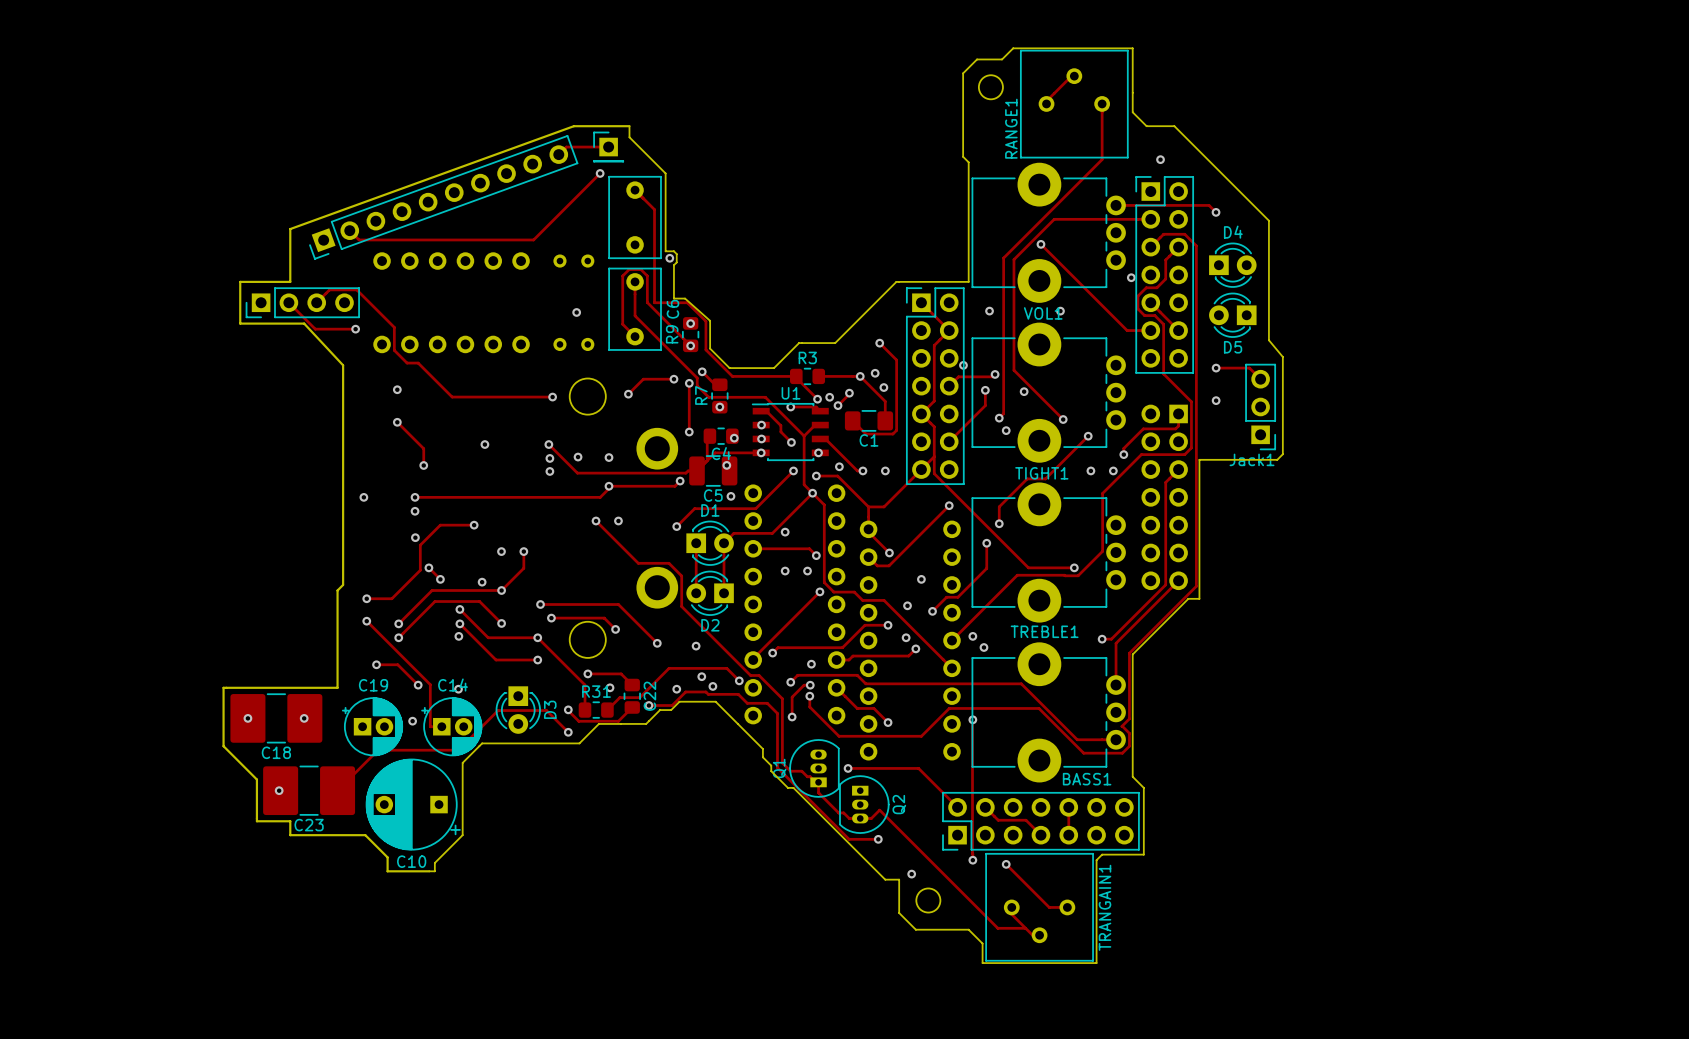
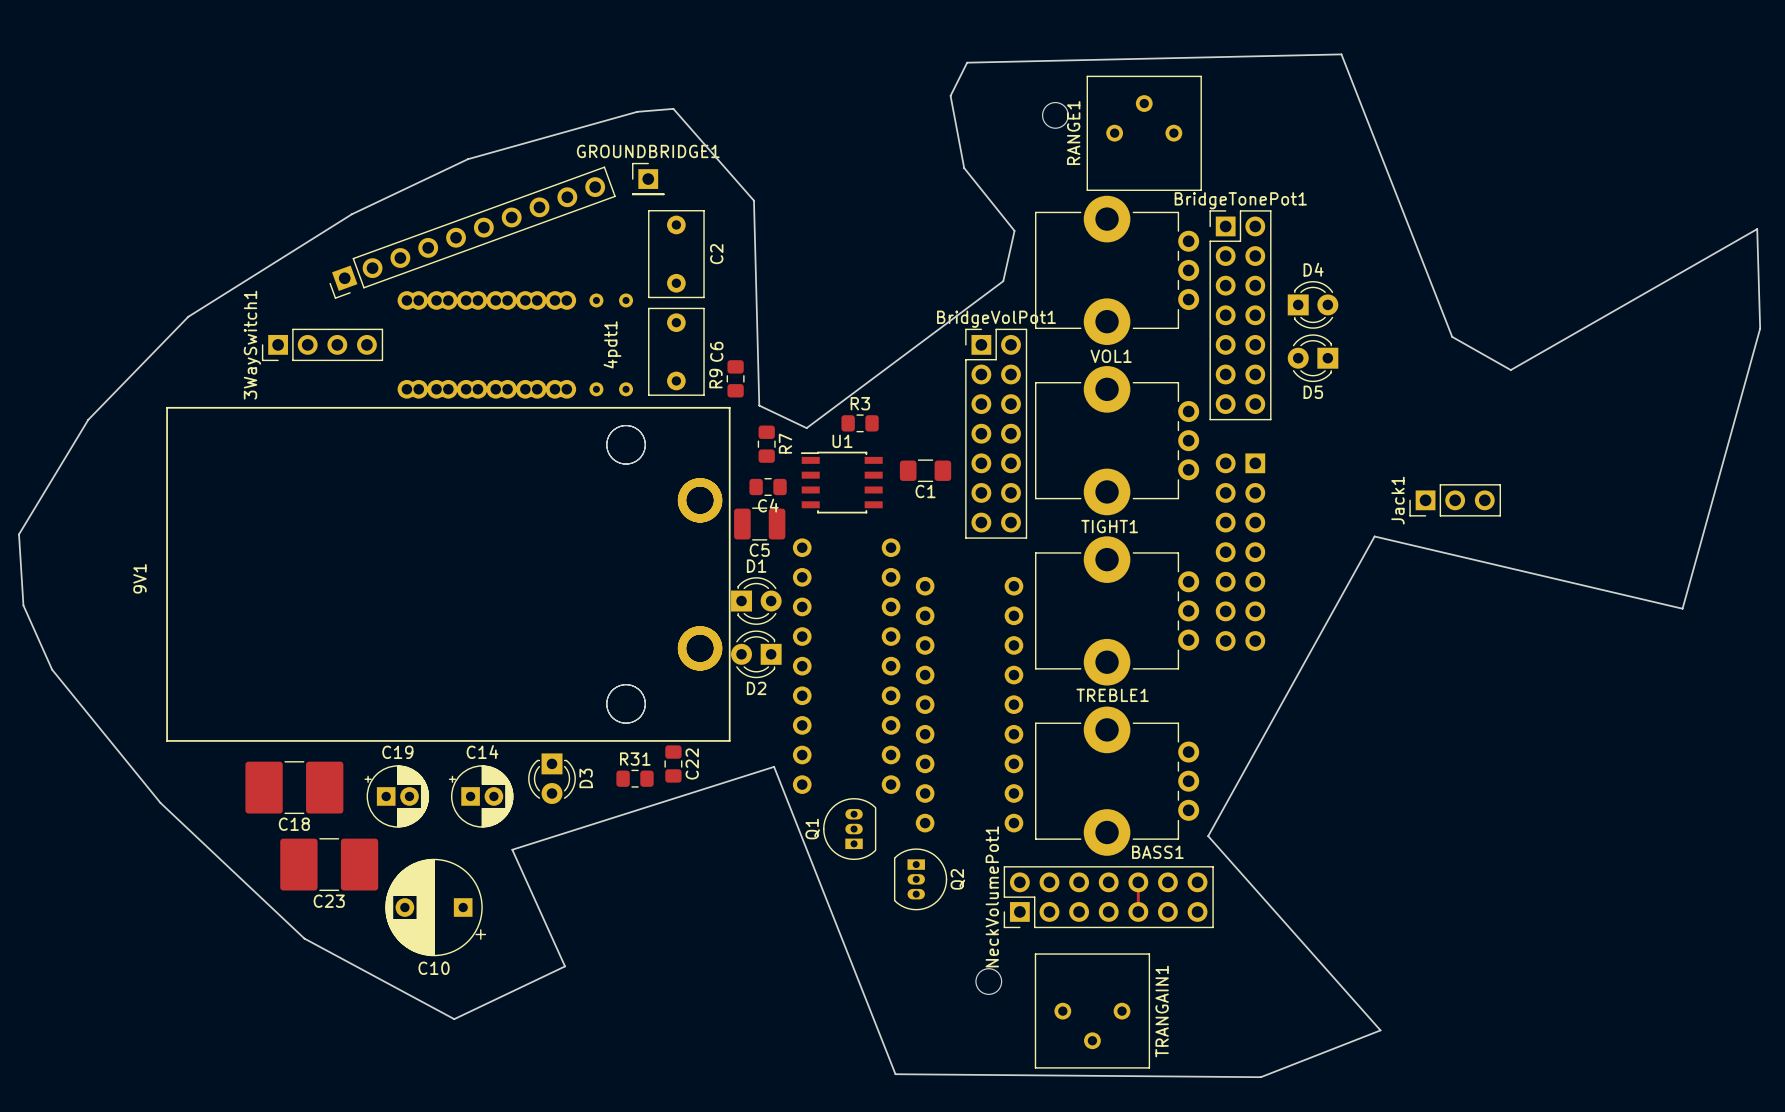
board edge: (1013, 48) (1002, 59) (977, 59) (963, 73) (963, 156) (968, 162) (968, 281) (896, 281) (835, 343) (799, 343) (774, 368) (729, 368) (710, 348) (710, 320) (685, 298) (673, 298) (673, 265) (676, 262) (676, 254) (673, 251) (665, 251) (665, 173) (629, 137) (629, 126) (573, 126) (290, 229) (290, 281) (240, 281) (240, 323) (304, 323) (343, 365) (343, 584) (337, 590) (337, 687) (223, 687) (223, 746) (256, 779) (256, 821) (290, 821) (290, 835) (365, 835) (387, 857) (387, 871) (434, 871) (434, 862) (462, 835) (462, 762) (482, 743) (579, 743) (598, 723) (646, 723) (660, 710) (671, 710) (679, 701) (715, 701) (762, 748) (762, 757) (771, 765) (771, 771) (787, 787) (793, 787) (885, 879) (899, 879) (899, 913) (915, 929) (968, 929) (982, 943) (982, 963) (1096, 963) (1096, 860) (1102, 854) (1143, 854) (1143, 787) (1132, 776) (1132, 654) (1188, 598) (1199, 598) (1199, 459) (1277, 459) (1282, 454) (1282, 356) (1268, 340) (1268, 220) (1174, 126) (1146, 126) (1132, 112) (1132, 48) (1013, 48) -> (1341, 54) (967, 62) (950, 95) (964, 168) (1014, 230) (1003, 281) (806, 428) (759, 405) (753, 200) (673, 108) (637, 111) (467, 159) (351, 214) (188, 316) (88, 419) (19, 534) (23, 605) (52, 669) (160, 802) (304, 938) (454, 1019) (565, 966) (512, 849) (774, 766) (895, 1074) (1260, 1077) (1380, 1030) (1208, 836) (1374, 536) (1682, 608) (1760, 328) (1757, 229) (1510, 370) (1452, 336) (1341, 54)
track: (1074, 73) (1046, 101) -> none
track: (1102, 101) (1102, 159) (1003, 258) (1003, 413) (999, 418) -> none
GROUNDBRIDGE1 name: none -> GROUNDBRIDGE1 (648, 151)
RANGE1 name position: RANGE1 (1011, 128) -> RANGE1 (1073, 133)
track: (608, 147) (566, 147) (558, 154) -> none
via: (1160, 159) -> none
BridgeTonePot1 name: none -> BridgeTonePot1 (1240, 200)
track: (600, 173) (533, 239) (359, 239) (349, 230) -> none
via: (600, 173) -> none
track: (635, 190) (654, 209) (654, 302) (687, 302) (705, 321) (705, 349) (732, 376) (796, 376) (817, 399) -> none
track: (1116, 205) (1209, 205) (1216, 212) -> none
via: (1216, 212) -> none
C2 name: none -> C2 (716, 254)
track: (1150, 219) (1054, 219) (1013, 259) (1013, 370) (1063, 419) -> none
track: (1040, 244) (1127, 330) (1150, 330) -> none
via: (1040, 244) -> none
track: (1150, 247) (1163, 234) (1184, 234) (1196, 245) (1196, 586) (1129, 653) (1129, 718) (1121, 726) (1129, 733) (1129, 746) (1122, 753) (1083, 753) (1039, 708) (949, 708) (921, 736) (839, 736) (809, 707) (809, 696) -> none
track: (1178, 247) (1165, 260) (1165, 279) (1156, 287) (1146, 287) (1137, 296) (1137, 308) (1144, 315) (1154, 315) (1163, 324) (1163, 374) (1191, 401) (1191, 447) (1184, 454) (1141, 454) (1102, 493) (1102, 551) (1078, 575) (1017, 575) (952, 640) -> none
via: (669, 258) -> none
via: (1131, 277) -> none
BridgeVolPot1 name: none -> BridgeVolPot1 (996, 319)
track: (635, 281) (635, 315) (697, 378) (697, 385) (708, 397) (765, 397) (804, 436) -> none
track: (288, 302) (315, 329) (355, 329) -> none
track: (316, 302) (329, 289) (356, 289) (394, 327) (394, 350) (407, 363) (418, 363) (452, 397) (552, 397) -> none
4pdt1: none -> (492, 344)
track: (921, 302) (949, 330) (934, 345) (934, 401) (921, 413) (934, 426) (934, 473) (1028, 567) (1074, 567) -> none
track: (1150, 302) (1178, 330) -> none
3WaySwitch1 name: none -> 3WaySwitch1 (252, 345)
via: (989, 311) -> none
via: (1060, 311) -> none
via: (576, 312) -> none
via: (690, 323) -> none
via: (355, 329) -> none
track: (635, 336) (622, 324) (622, 275) (629, 269) (640, 269) (647, 275) (647, 302) (690, 345) -> none
track: (879, 343) (896, 360) (896, 430) (892, 434) (865, 434) (852, 420) -> none
via: (879, 343) -> none
via: (690, 345) -> none
via: (963, 365) -> none
track: (1216, 368) (1249, 368) (1260, 379) -> none
via: (1216, 368) -> none
track: (702, 371) (715, 384) (719, 384) -> none
via: (702, 371) -> none
via: (875, 373) -> none
track: (995, 374) (992, 376) (958, 376) (949, 386) -> none
via: (995, 374) -> none
track: (818, 376) (860, 376) (885, 401) (885, 420) -> none
via: (860, 376) -> none
track: (673, 379) (643, 379) (628, 394) -> none
via: (673, 379) -> none
track: (689, 383) (689, 432) -> none
via: (689, 383) -> none
via: (883, 387) -> none
via: (397, 389) -> none
track: (985, 390) (985, 405) (949, 441) -> none
via: (985, 390) -> none
via: (1024, 391) -> none
track: (849, 393) (838, 405) -> none
via: (849, 393) -> none
via: (628, 394) -> none
R7 name position: R7 (701, 395) -> R7 (785, 443)
via: (552, 397) -> none
via: (829, 397) -> none
via: (817, 399) -> none
via: (1216, 400) -> none
via: (838, 405) -> none
via: (719, 407) -> none
track: (790, 407) (816, 407) (820, 411) -> none
via: (790, 407) -> none
Jack1 rotation: 0° (1260, 407) -> 90° clockwise (1455, 500)
Jack1 position: (1260, 407) -> (1455, 500)
track: (761, 411) (766, 411) (780, 425) (780, 431) (791, 442) -> none
track: (1178, 413) (1178, 425) (1175, 428) (1143, 428) (1123, 448) (1123, 454) -> none
via: (999, 418) -> none
via: (1063, 419) -> none
track: (397, 422) (423, 448) (423, 465) -> none
via: (397, 422) -> none
via: (761, 425) -> none
track: (820, 425) (815, 425) (804, 436) -> none
via: (1006, 430) -> none
via: (689, 432) -> none
track: (804, 436) (804, 484) (824, 504) (824, 582) (833, 592) (854, 592) (862, 600) (884, 600) (952, 668) -> none
track: (1088, 436) (1045, 478) (1027, 478) (999, 506) (999, 523) -> none
via: (1088, 436) -> none
track: (707, 437) (707, 460) -> none
via: (734, 438) -> none
via: (761, 438) -> none
track: (820, 438) (825, 438) (857, 470) (862, 470) -> none
via: (791, 442) -> none
via: (484, 444) -> none
track: (548, 444) (577, 473) (685, 473) (688, 470) (697, 470) (715, 452) (761, 452) -> none
via: (548, 444) -> none
via: (761, 452) -> none
via: (818, 452) -> none
via: (1123, 454) -> none
track: (934, 456) (884, 506) (868, 506) -> none
via: (578, 457) -> none
via: (608, 457) -> none
via: (549, 458) -> none
via: (423, 465) -> none
via: (726, 465) -> none
via: (839, 466) -> none
track: (1178, 469) (1165, 482) (1165, 584) (1111, 639) (1102, 639) -> none
track: (793, 470) (755, 508) (694, 508) (676, 526) -> none
via: (793, 470) -> none
via: (862, 470) -> none
via: (885, 470) -> none
via: (1090, 470) -> none
via: (1113, 470) -> none
via: (549, 471) -> none
track: (816, 476) (837, 476) (868, 506) -> none
via: (816, 476) -> none
track: (680, 481) (674, 486) (608, 486) (600, 497) (415, 497) -> none
via: (680, 481) -> none
via: (608, 486) -> none
track: (812, 493) (772, 533) (733, 533) (724, 543) (724, 593) -> none
via: (812, 493) -> none
via: (730, 496) -> none
via: (363, 497) -> none
via: (415, 497) -> none
track: (949, 505) (889, 565) (877, 565) (868, 557) -> none
via: (949, 505) -> none
track: (868, 506) (868, 532) (889, 552) -> none
via: (415, 511) -> none
9V1: none -> (448, 574)
track: (596, 520) (638, 563) (669, 563) (681, 576) (681, 606) (750, 675) (759, 675) (782, 698) (782, 763) (790, 771) (801, 771) (815, 782) (818, 782) (818, 792) (838, 813) -> none
via: (596, 520) -> none
via: (618, 520) -> none
via: (999, 523) -> none
track: (474, 525) (440, 525) (420, 545) (420, 570) (391, 598) (366, 598) -> none
via: (474, 525) -> none
via: (676, 526) -> none
via: (785, 532) -> none
via: (415, 537) -> none
track: (696, 543) (696, 593) -> none
track: (986, 543) (986, 568) (957, 597) (946, 597) (932, 611) -> none
via: (986, 543) -> none
track: (753, 548) (809, 548) (816, 555) -> none
via: (501, 551) -> none
track: (523, 551) (523, 568) (501, 590) (432, 590) (398, 623) -> none
via: (523, 551) -> none
via: (889, 552) -> none
via: (816, 555) -> none
track: (428, 567) (440, 579) -> none
via: (428, 567) -> none
via: (1074, 567) -> none
via: (785, 571) -> none
via: (807, 571) -> none
via: (440, 579) -> none
via: (921, 579) -> none
track: (1178, 580) (1116, 643) (1116, 685) -> none
via: (482, 582) -> none
via: (501, 590) -> none
track: (819, 591) (753, 660) -> none
via: (819, 591) -> none
via: (366, 598) -> none
track: (540, 604) (618, 604) (657, 643) -> none
via: (540, 604) -> none
via: (907, 605) -> none
track: (459, 609) (488, 637) (537, 637) (585, 685) (585, 710) -> none
via: (459, 609) -> none
via: (932, 611) -> none
track: (551, 618) (604, 618) (615, 629) -> none
via: (551, 618) -> none
track: (366, 621) (430, 684) (430, 726) (441, 726) -> none
via: (366, 621) -> none
via: (398, 623) -> none
track: (459, 623) (496, 660) (537, 660) -> none
via: (459, 623) -> none
track: (501, 623) (479, 601) (434, 601) (398, 637) -> none
via: (501, 623) -> none
track: (888, 625) (864, 625) (842, 647) (778, 647) (772, 653) -> none
via: (888, 625) -> none
via: (615, 629) -> none
via: (458, 636) -> none
via: (972, 636) -> none
via: (398, 637) -> none
via: (537, 637) -> none
via: (906, 637) -> none
via: (1102, 639) -> none
via: (657, 643) -> none
via: (696, 646) -> none
via: (983, 647) -> none
track: (915, 648) (908, 656) (852, 656) (849, 660) (836, 660) -> none
via: (915, 648) -> none
via: (772, 653) -> none
via: (537, 660) -> none
track: (376, 664) (397, 664) (418, 685) -> none
via: (376, 664) -> none
via: (811, 664) -> none
track: (587, 673) (621, 673) (632, 685) -> none
via: (587, 673) -> none
via: (701, 676) -> none
track: (739, 680) (726, 668) (669, 668) (639, 697) (619, 697) (607, 710) -> none
via: (739, 680) -> none
track: (790, 682) (797, 675) (857, 675) (865, 683) (1021, 683) (1077, 739) (1116, 739) -> none
via: (790, 682) -> none
via: (418, 685) -> none
track: (810, 685) (804, 685) (792, 697) (792, 717) -> none
via: (810, 685) -> none
via: (712, 686) -> none
via: (610, 687) -> none
track: (836, 687) (857, 708) (873, 708) (888, 722) -> none
via: (458, 689) -> none
via: (676, 689) -> none
via: (809, 696) -> none
track: (648, 705) (672, 705) (685, 691) (738, 694) (747, 703) (767, 703) (777, 713) (777, 767) (849, 839) (878, 839) -> none
via: (648, 705) -> none
track: (632, 707) (618, 721) (578, 721) (568, 709) -> none
via: (568, 709) -> none
via: (792, 717) -> none
via: (247, 718) -> none
via: (304, 718) -> none
track: (972, 719) (972, 860) -> none
via: (972, 719) -> none
via: (412, 721) -> none
via: (888, 722) -> none
track: (568, 732) (546, 710) (498, 710) (458, 750) (378, 750) (337, 790) -> none
via: (568, 732) -> none
Q1 position: (814, 768) -> (849, 829)
track: (848, 768) (918, 768) (957, 807) -> none
via: (848, 768) -> none
via: (279, 790) -> none
C10 position: (413, 804) -> (435, 907)
track: (985, 807) (998, 820) (1026, 820) (1040, 835) -> none
track: (838, 812) (843, 812) (849, 818) (871, 818) (879, 810) (997, 928) (1025, 928) -> none
NeckVolumePot1 name: none -> NeckVolumePot1 (992, 896)
via: (878, 839) -> none
via: (972, 860) -> none
track: (1006, 864) (1049, 907) (1067, 907) -> none
via: (1006, 864) -> none
via: (911, 874) -> none
TRANGAIN1 position: (1039, 907) -> (1092, 1010)
track: (1010, 913) (1038, 940) -> none

